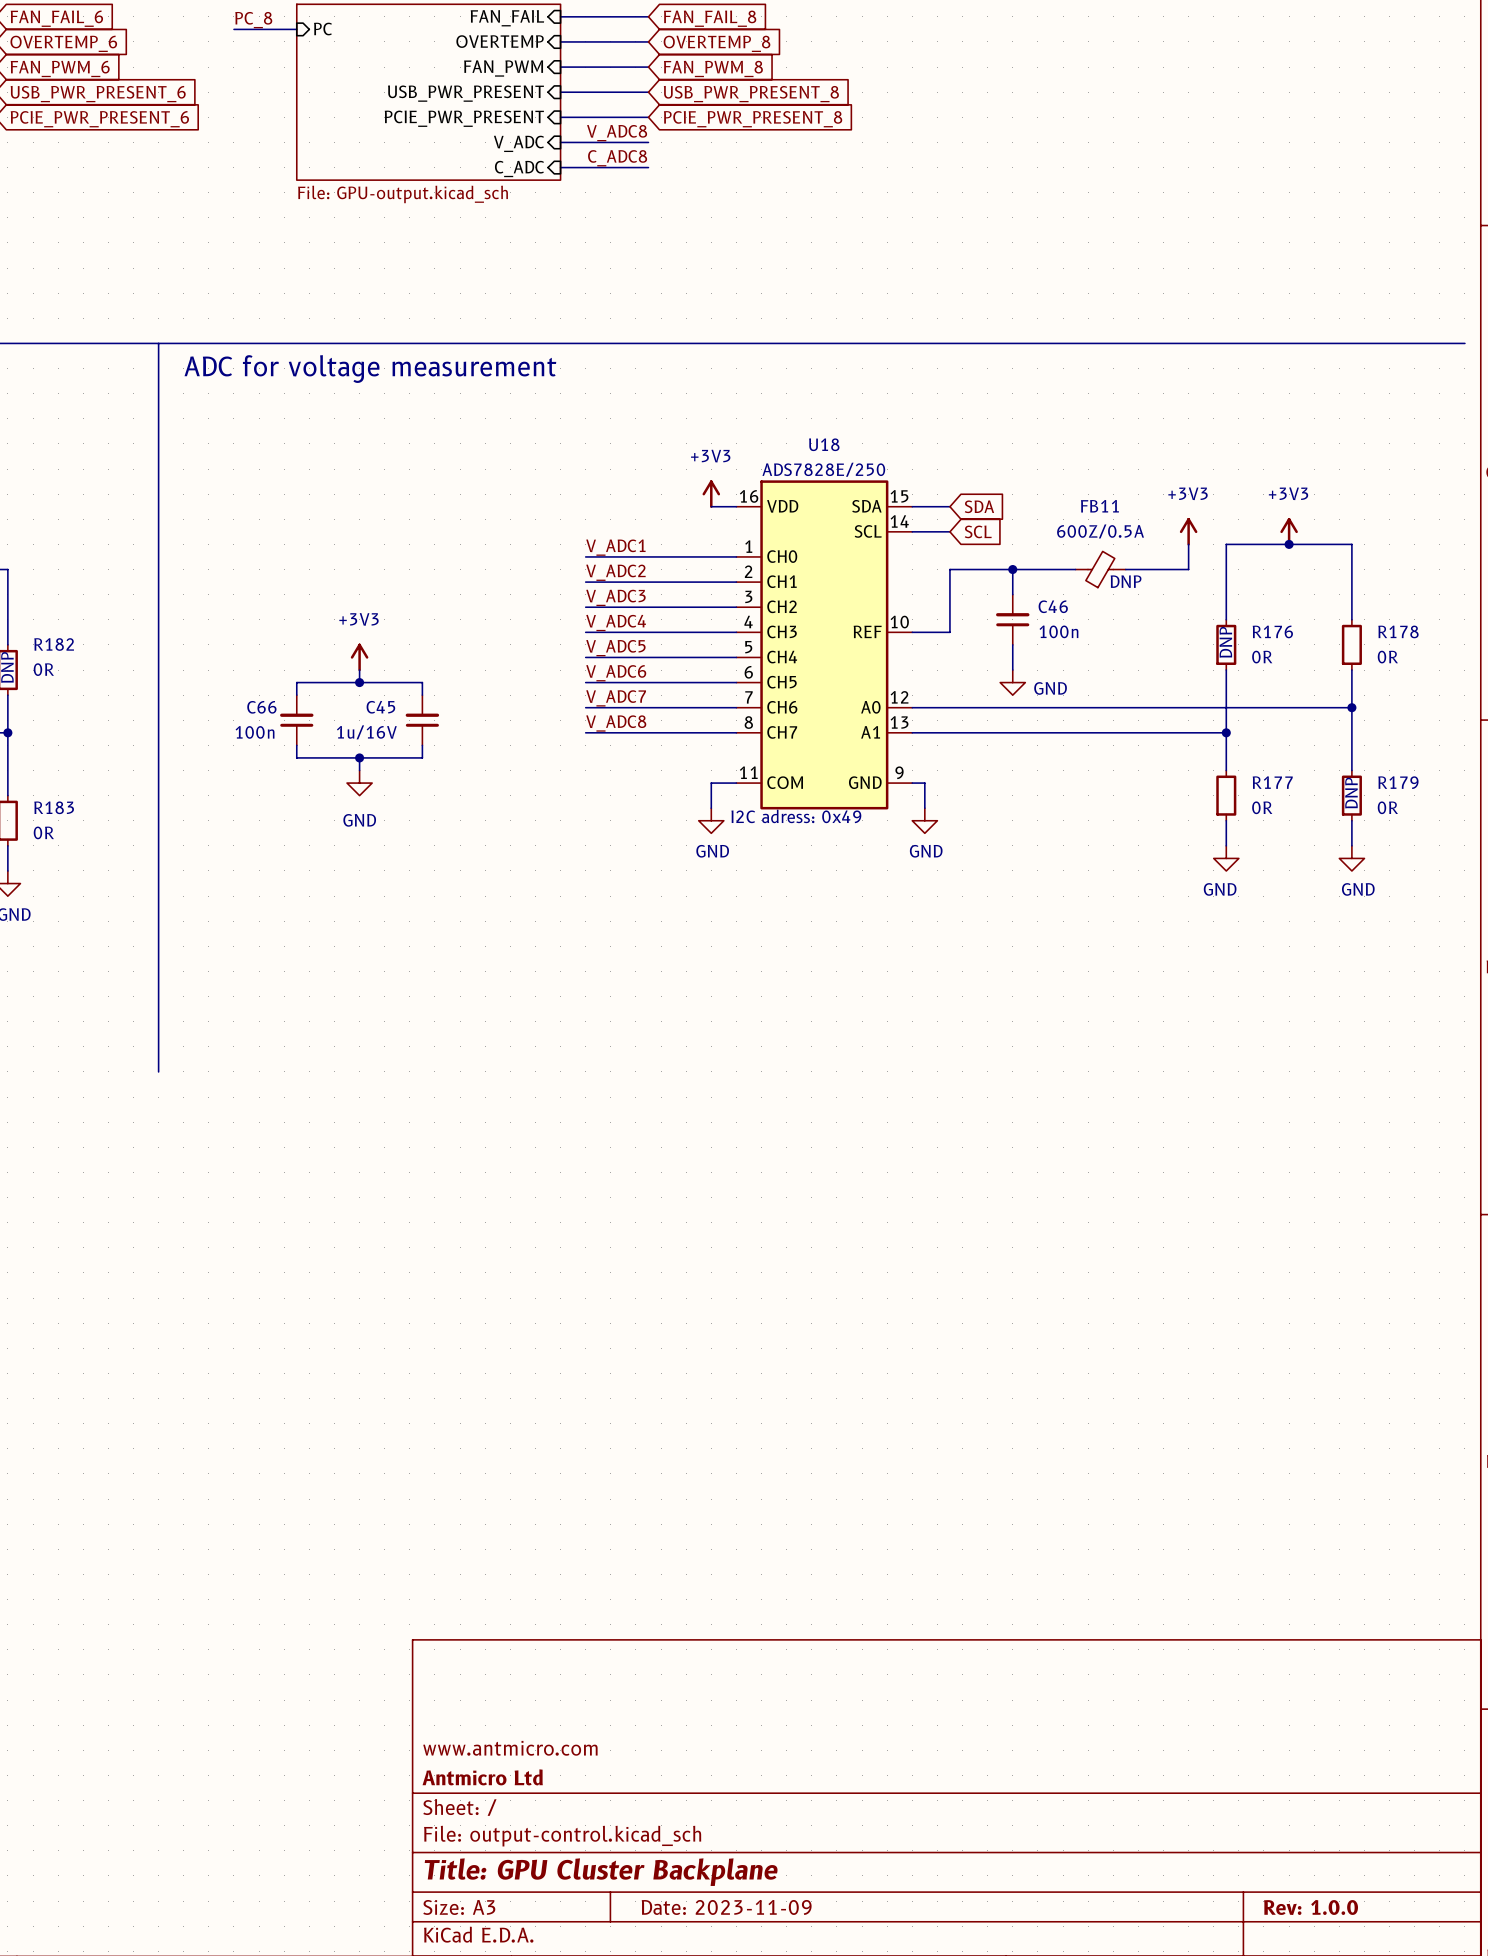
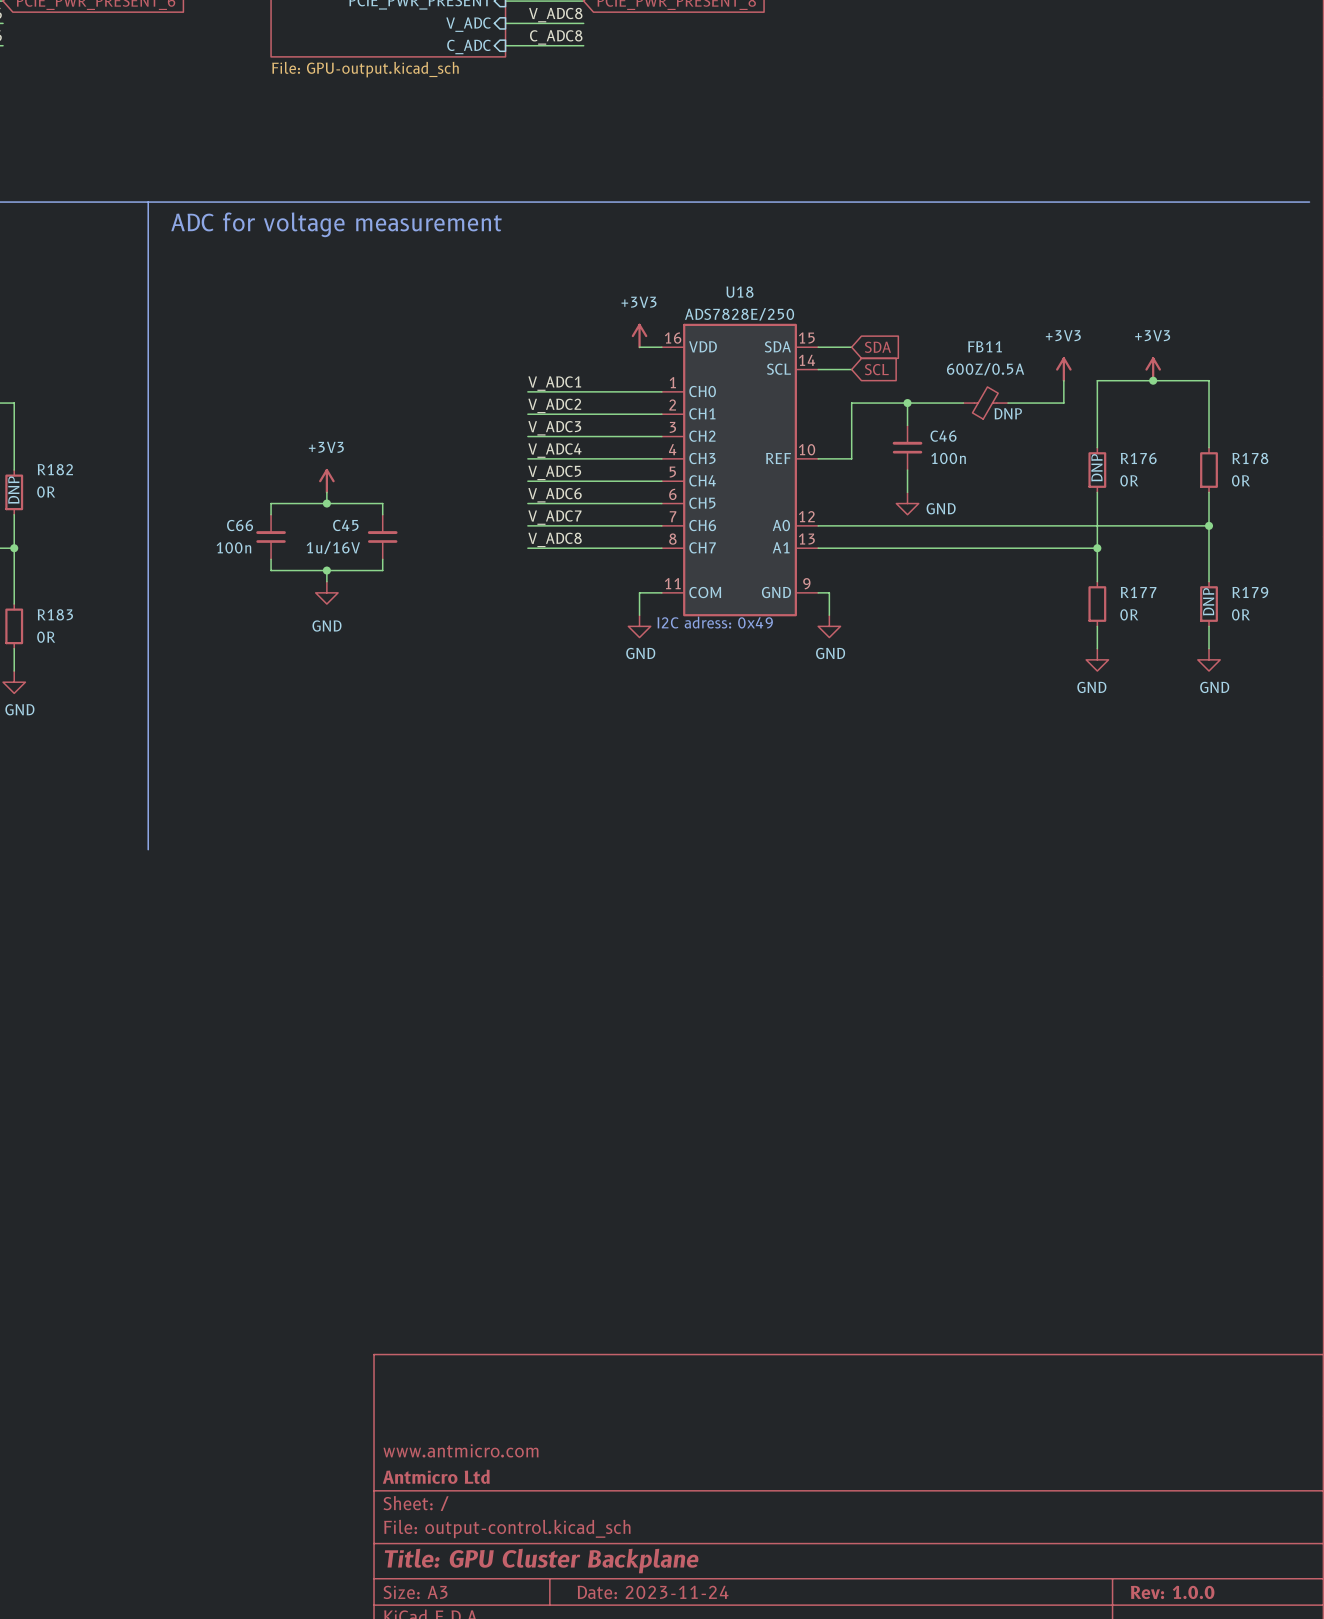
title block: Date: 2023-11-09 (726, 1907) -> Date: 2023-11-24 (653, 1592)

